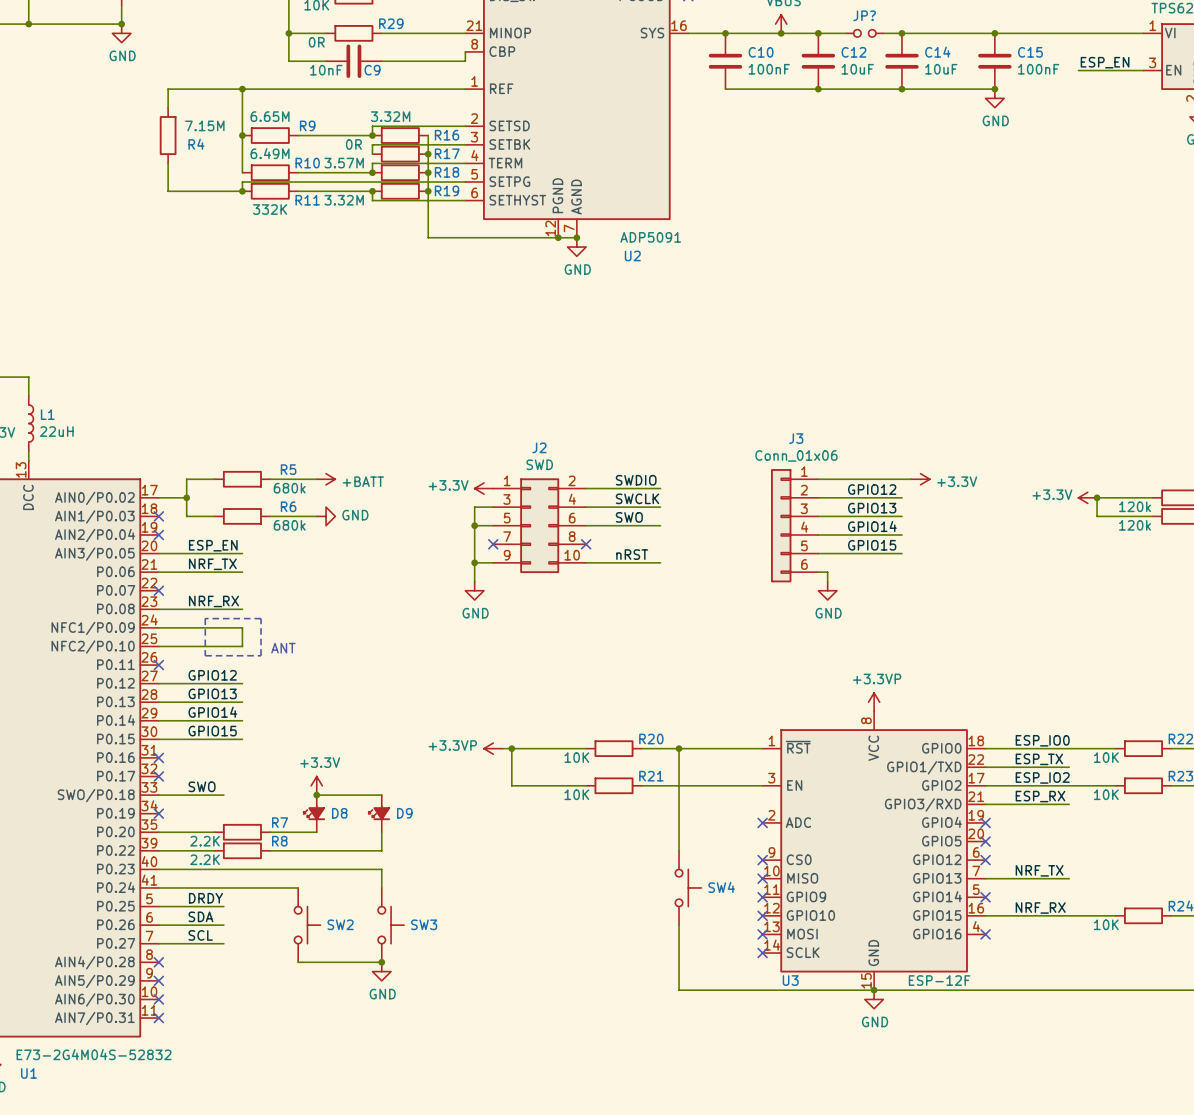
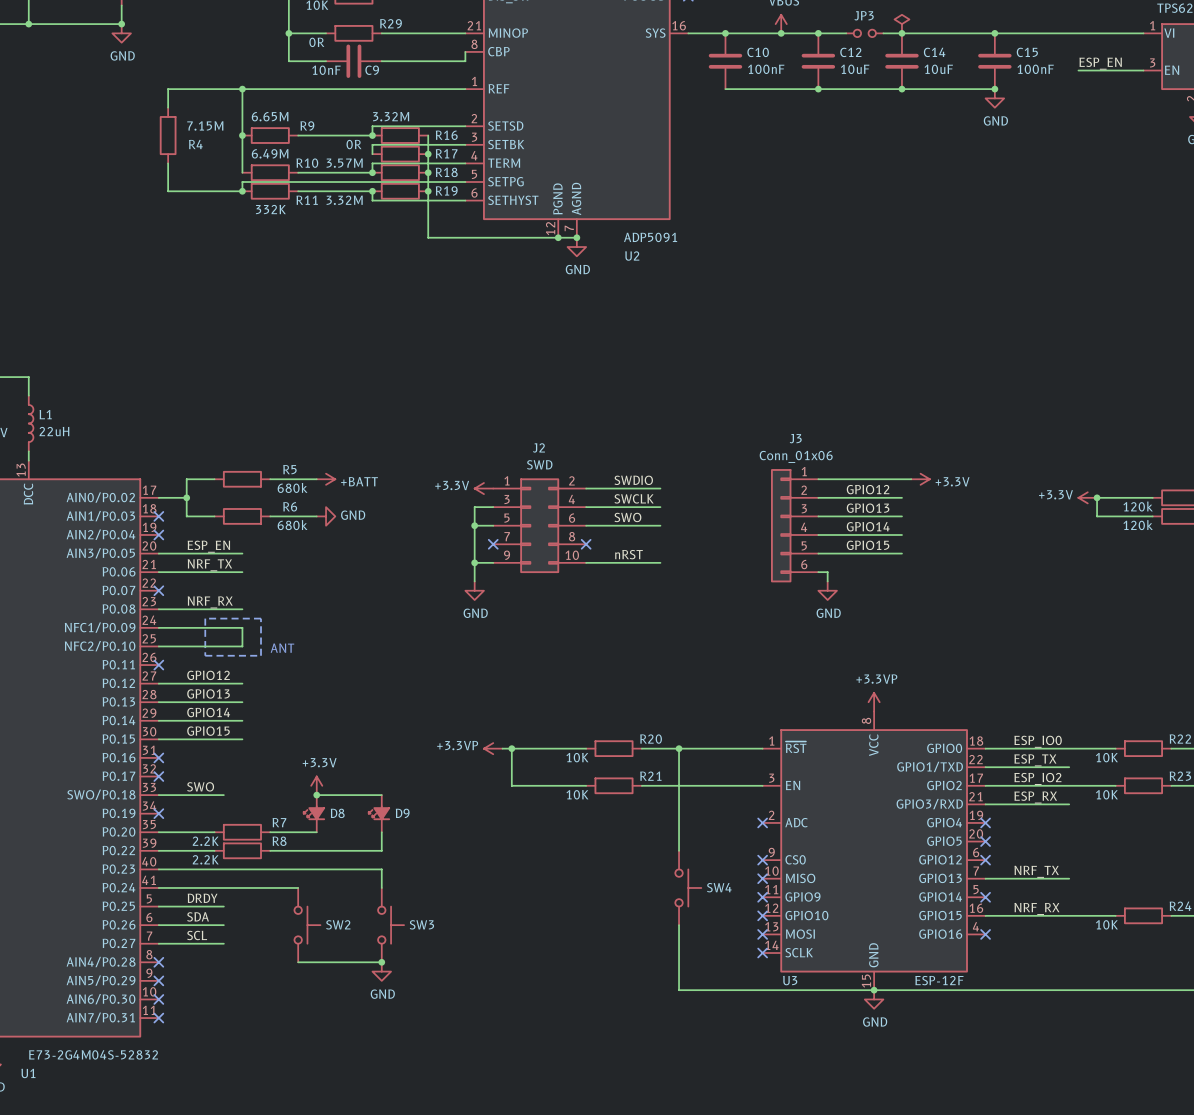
JP? name: JP? (864, 15) -> JP3 (864, 15)
power symbol: none -> (901, 24)

